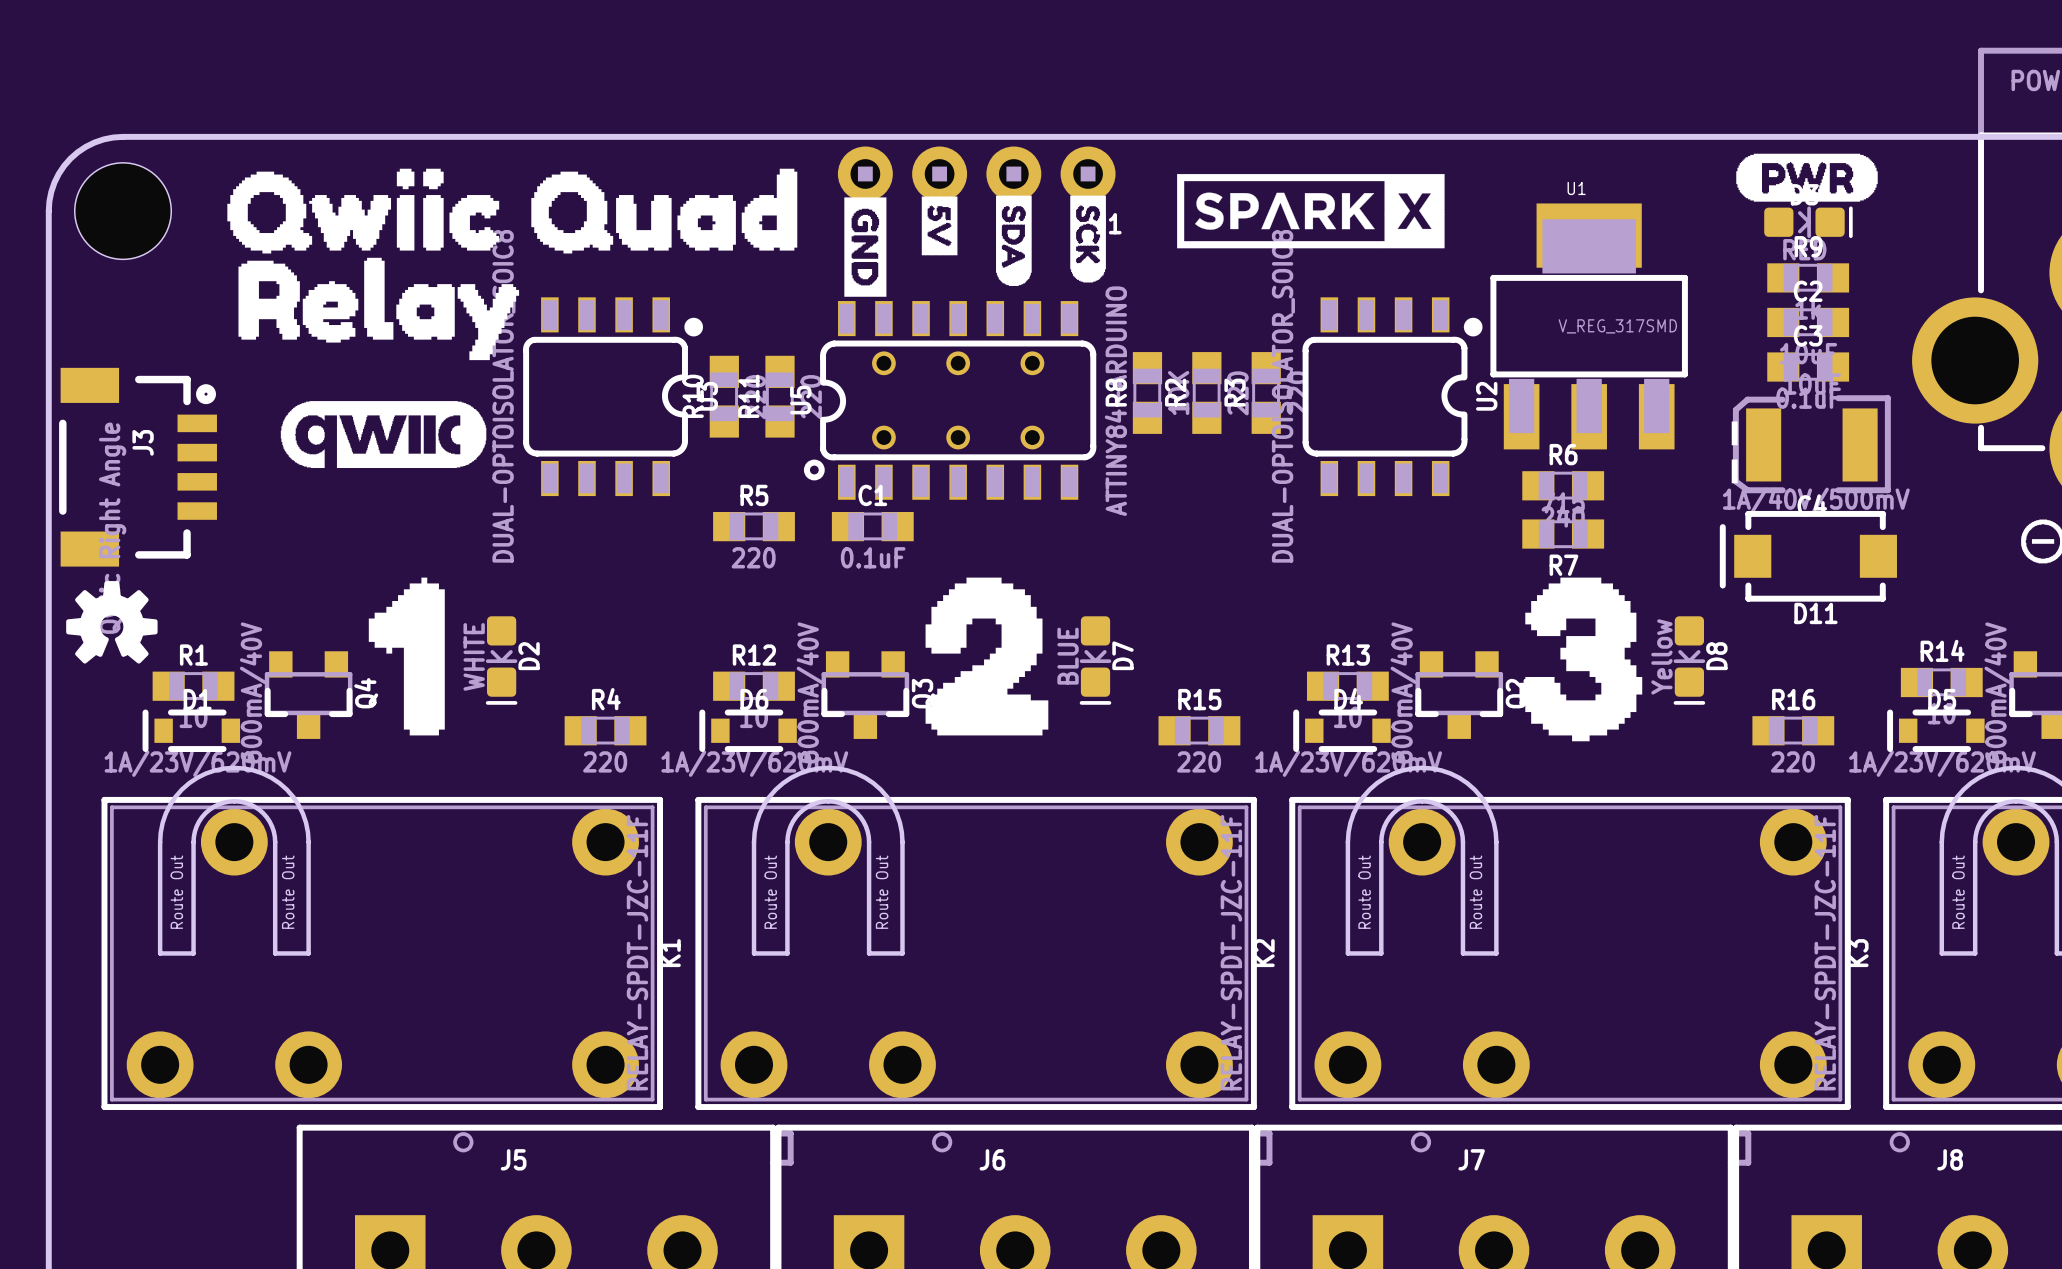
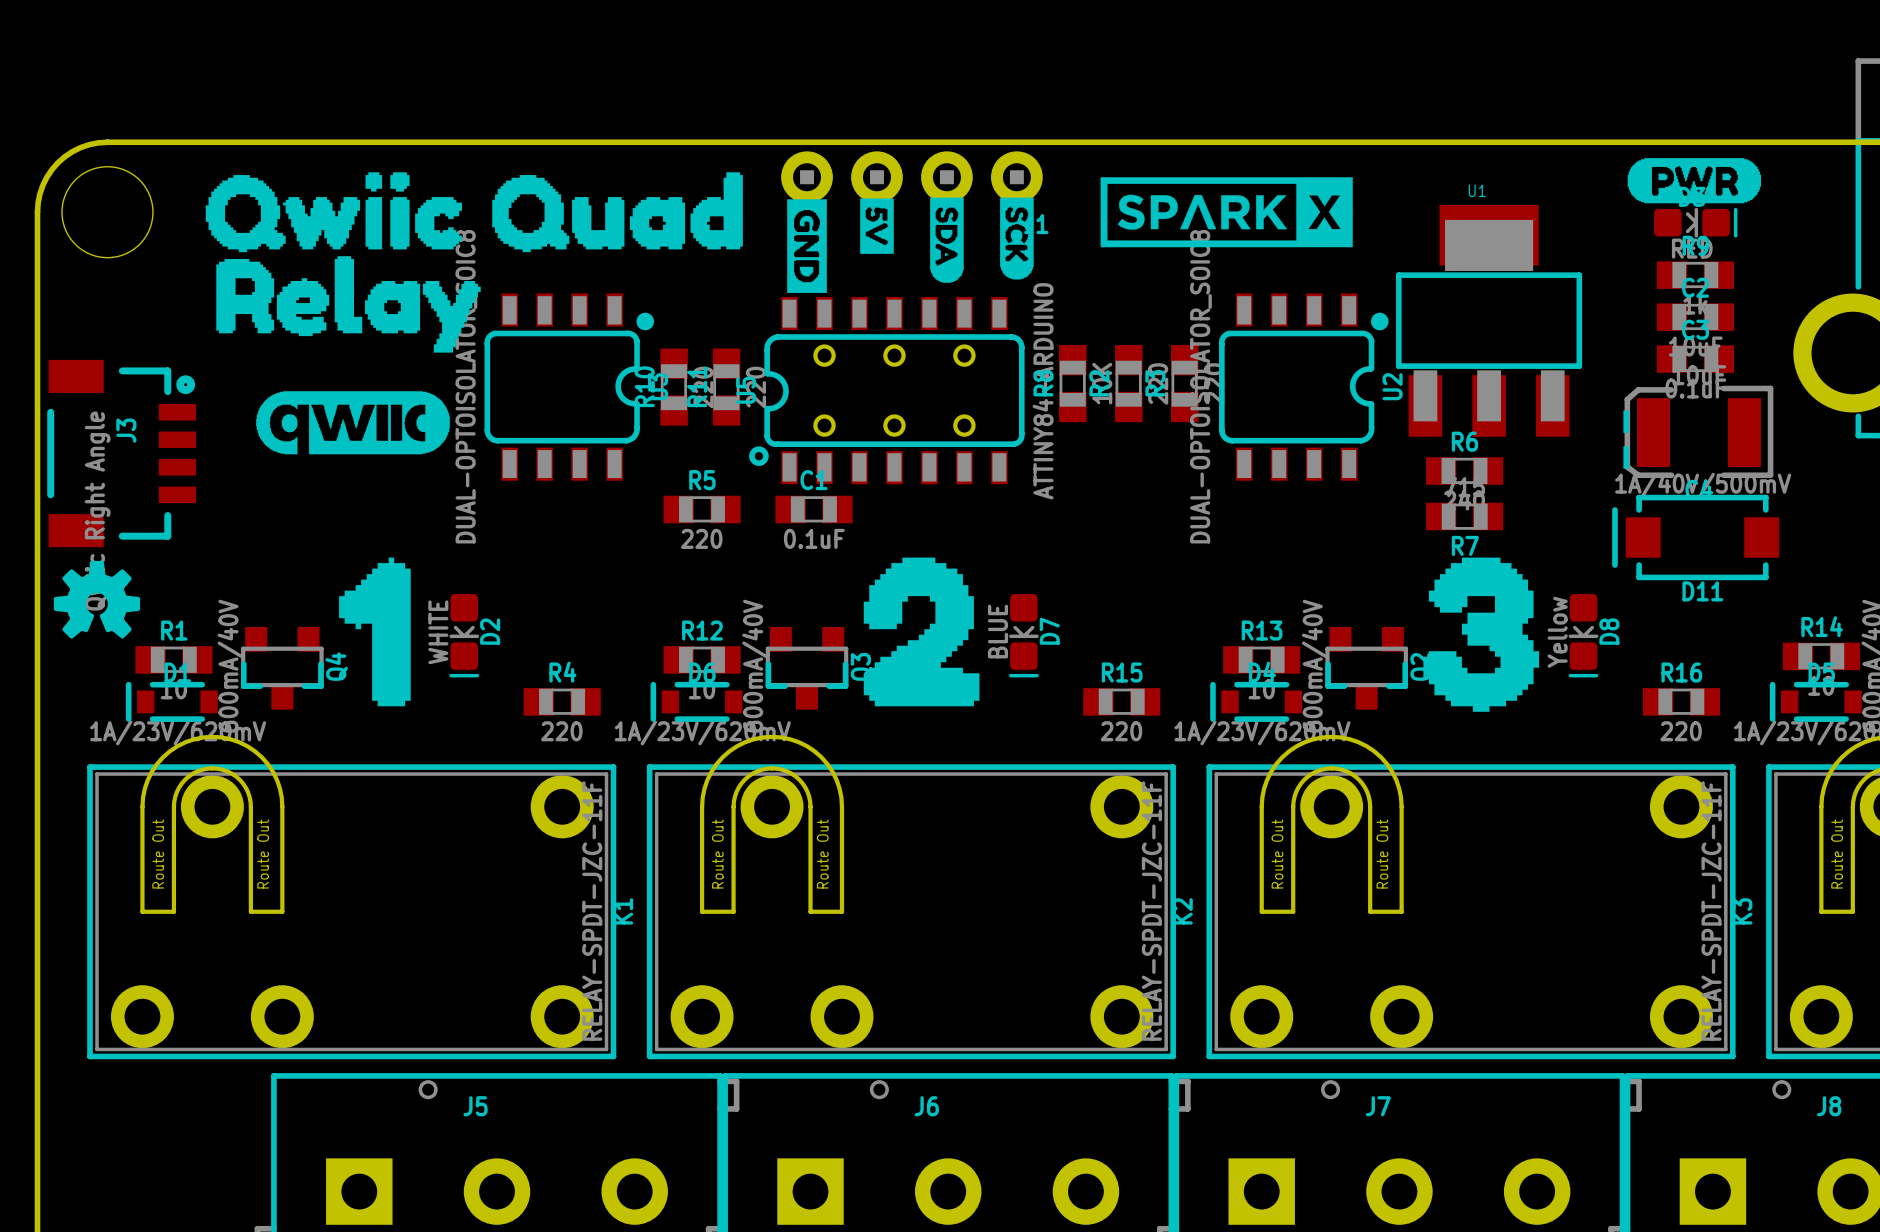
U1 value: V_REG_317SMD (1617, 326) -> none

